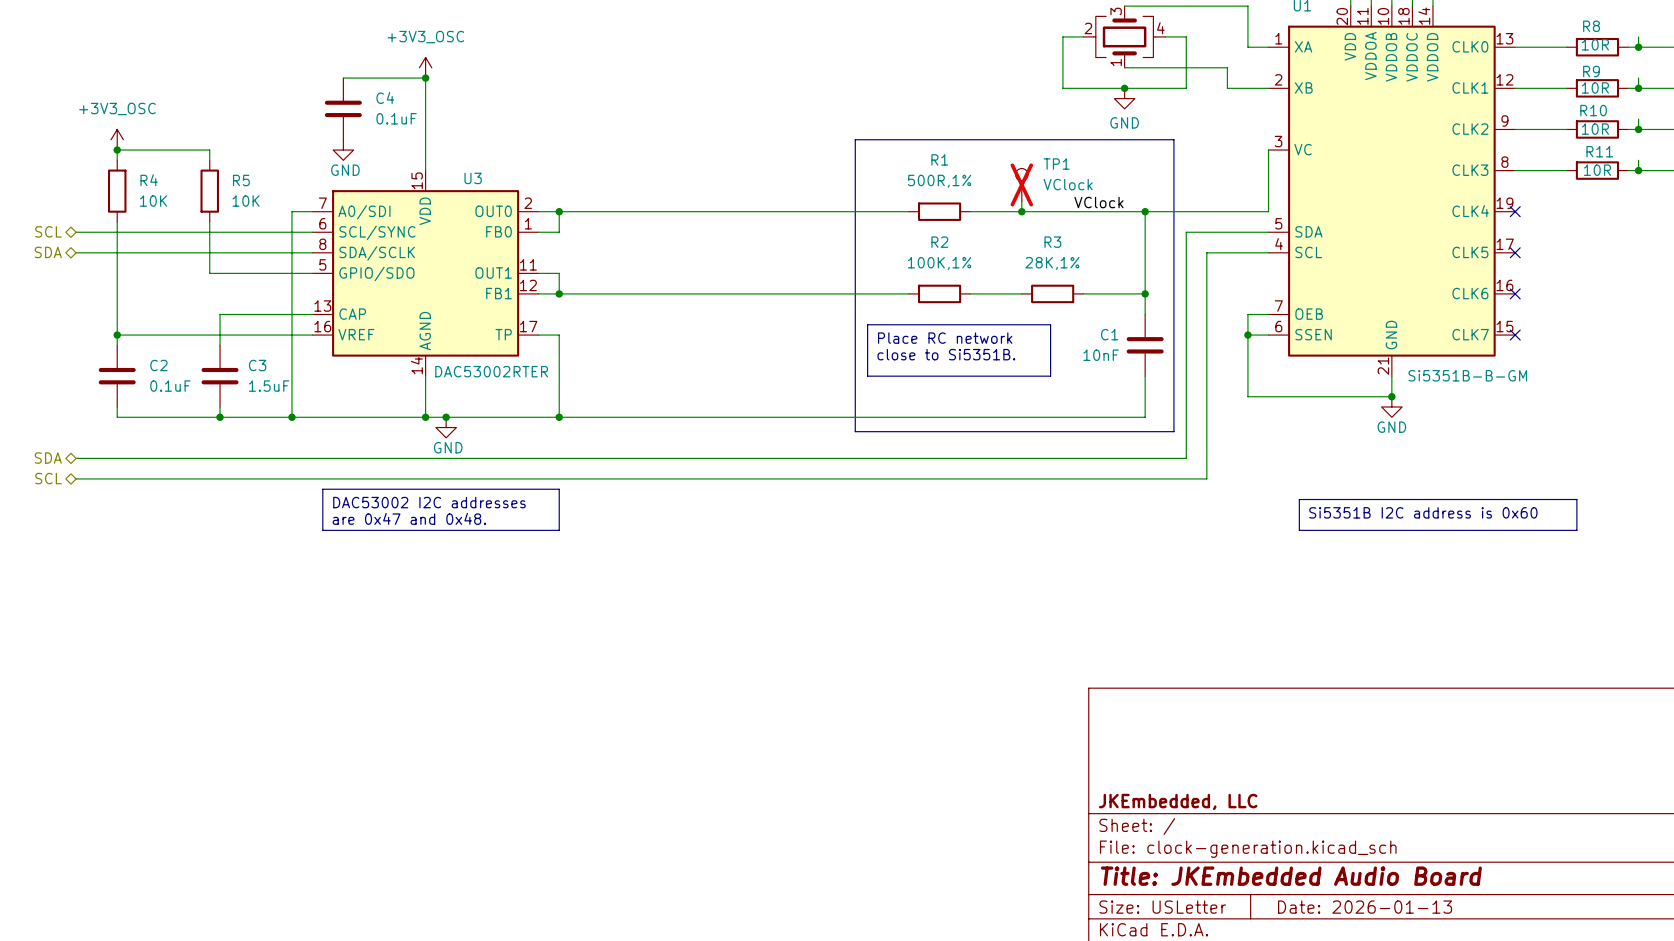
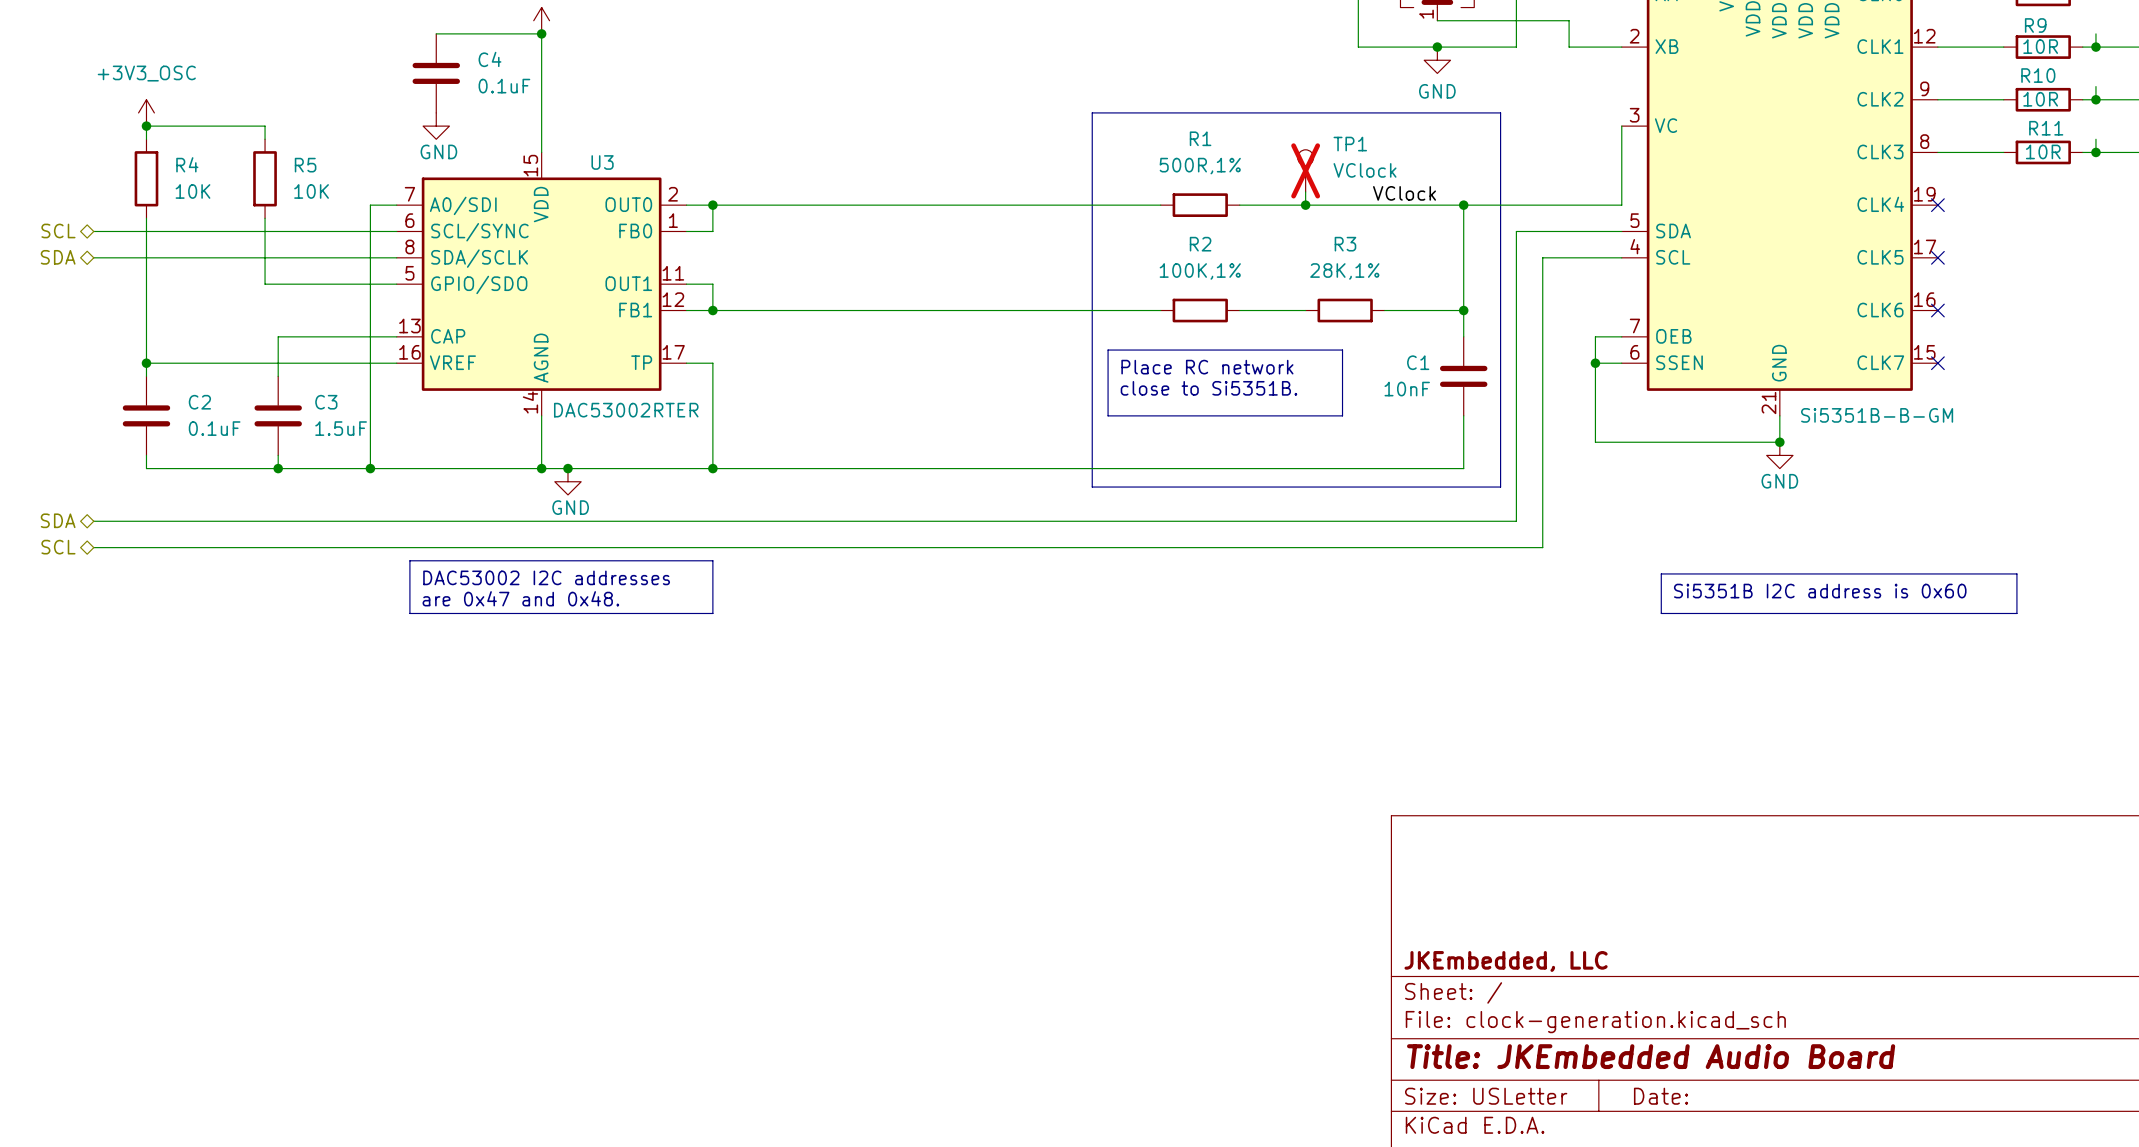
title block: Date: 2026-01-13 (1365, 907) -> Date: (1661, 1096)

